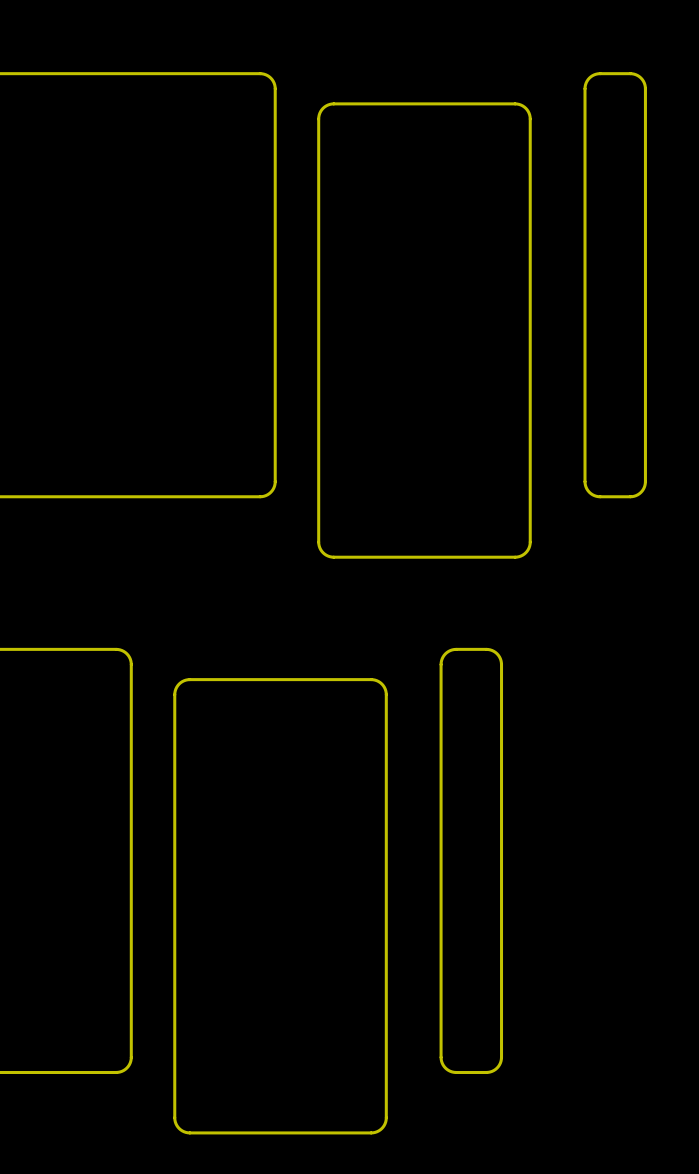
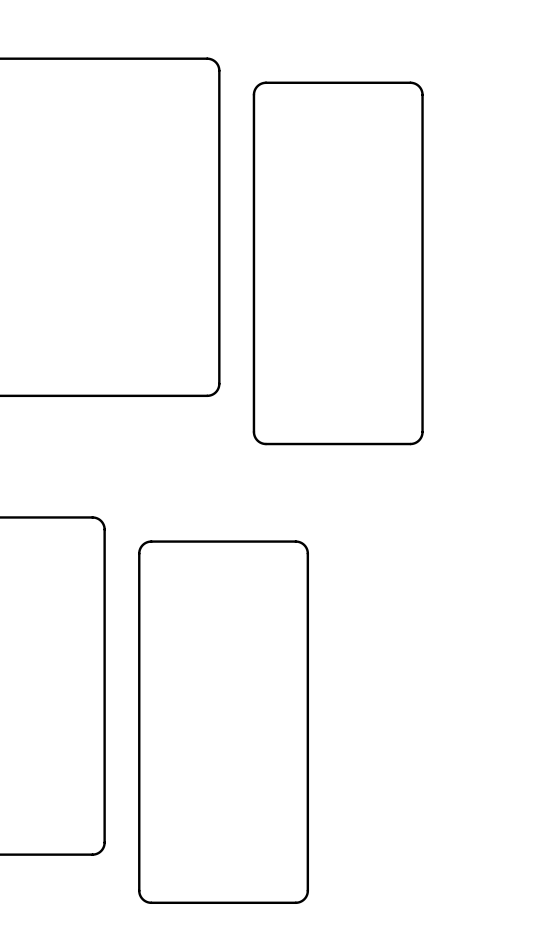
board edge: (600, 73) (634, 74) (641, 78) (645, 86) (645, 481) (641, 492) (632, 496) (596, 496) (589, 492) (585, 483) (585, 88) (589, 78) (600, 73) -> none
board edge: (456, 649) (490, 649) (497, 653) (501, 662) (501, 1057) (497, 1068) (488, 1072) (452, 1071) (445, 1068) (441, 1059) (441, 664) (445, 653) (456, 649) -> none

